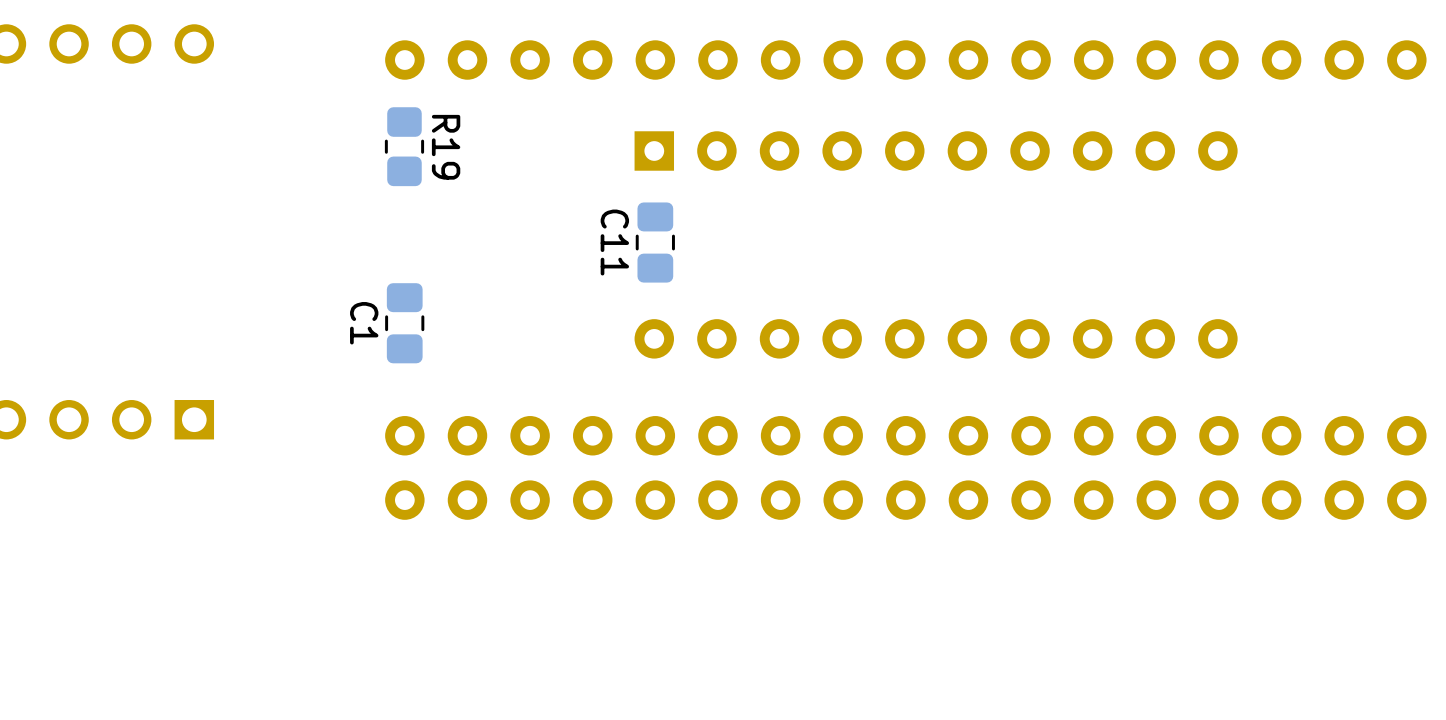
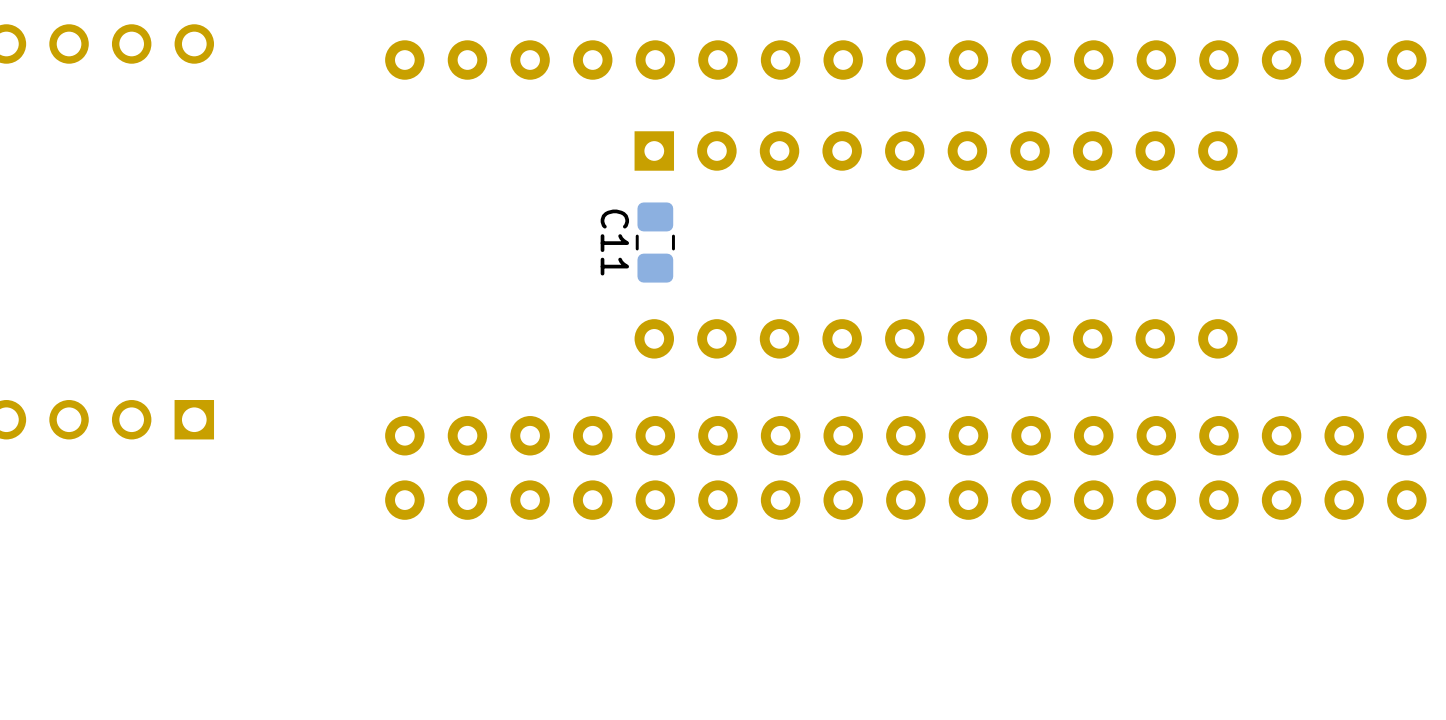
R19: (404, 146) -> none
C1: (404, 323) -> none

